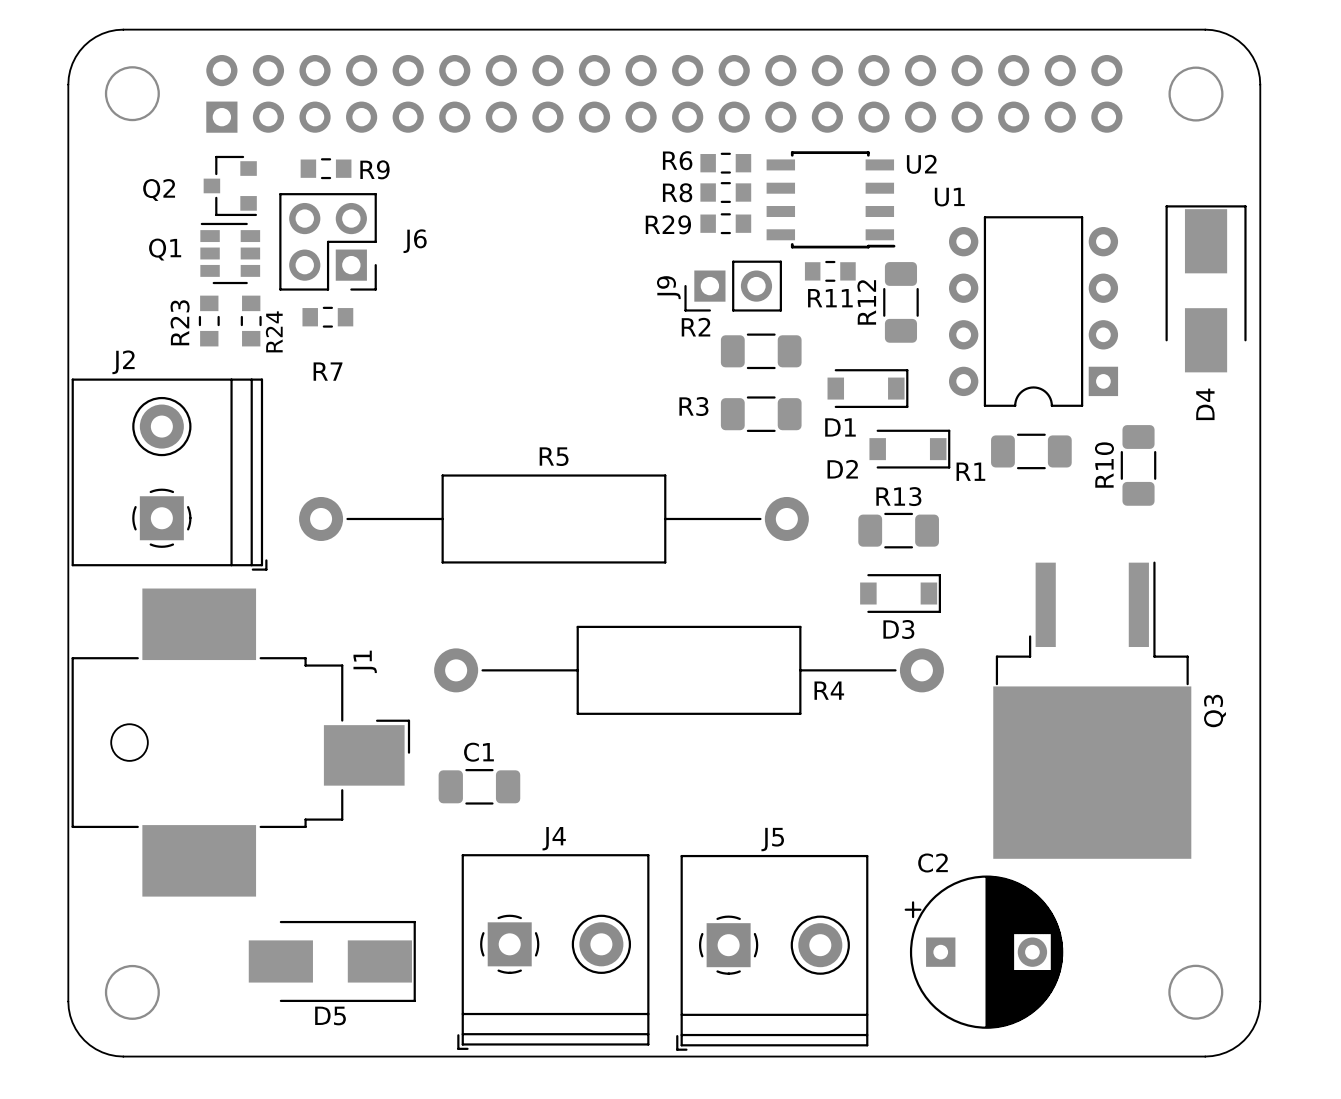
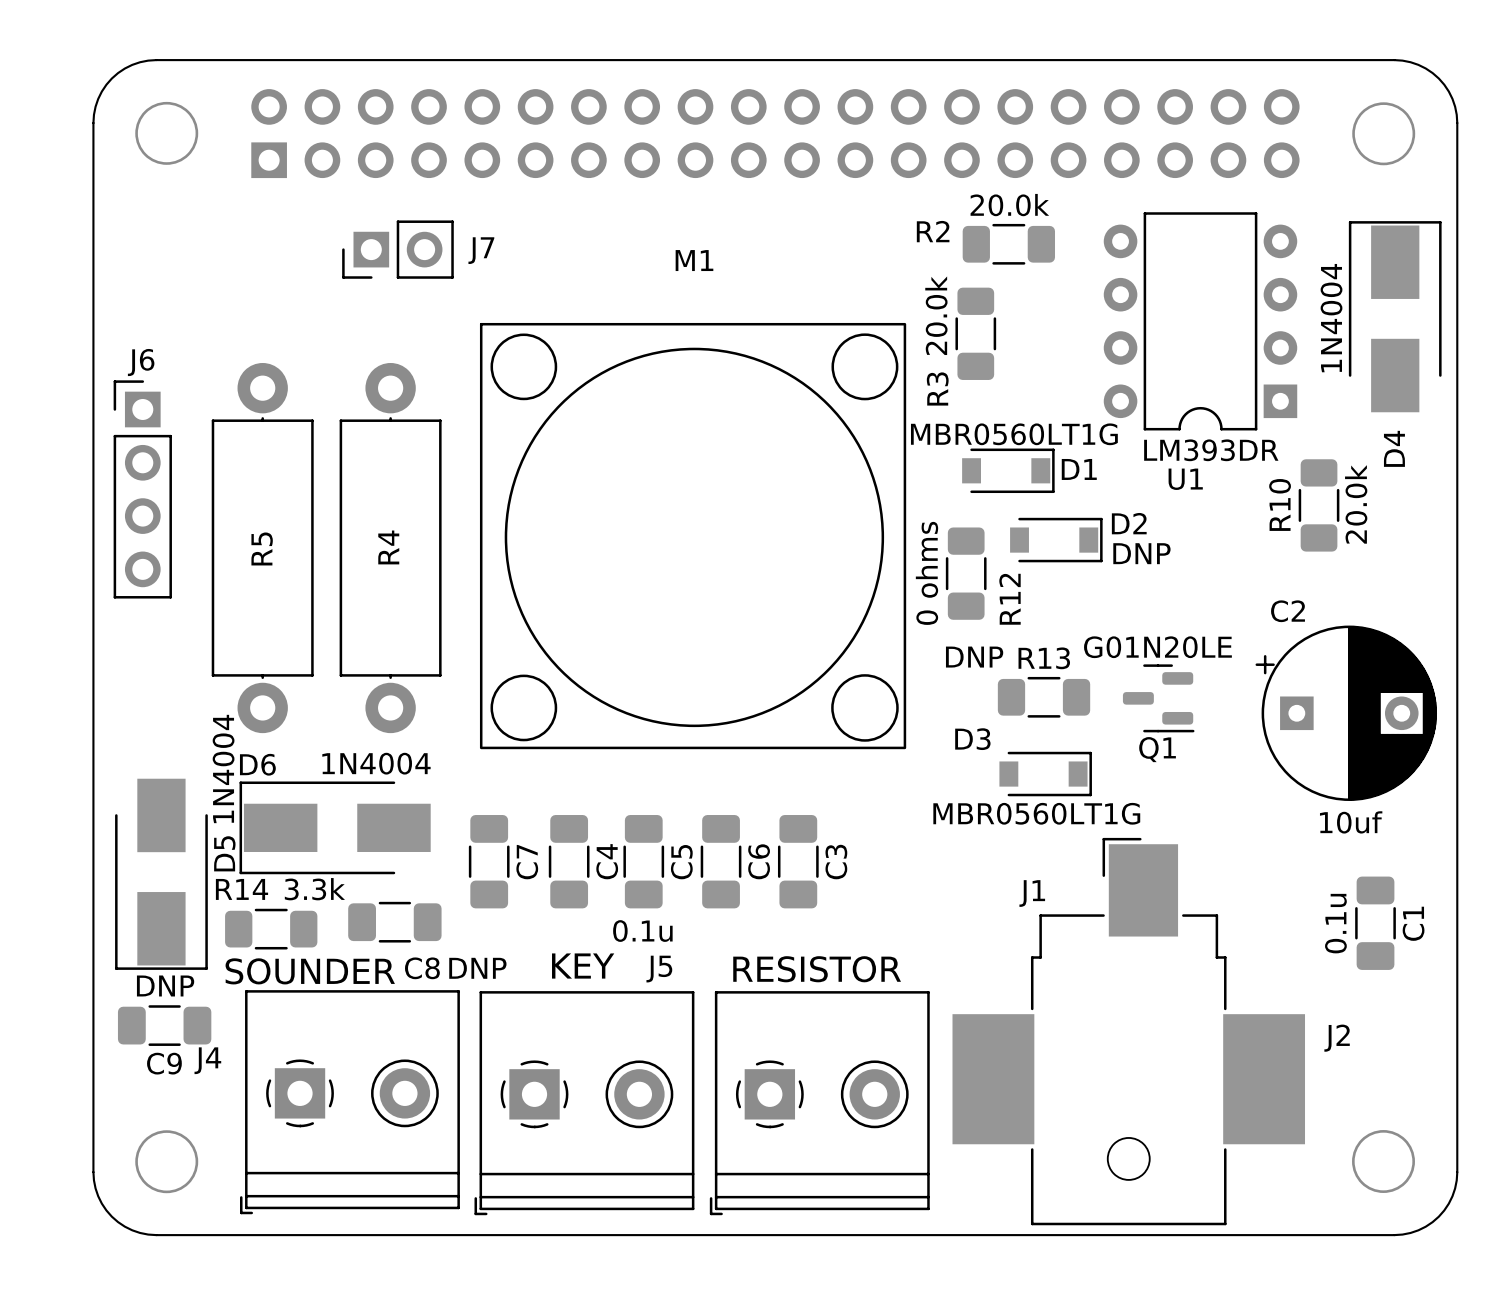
Q1 footprint: [203, 155, 258, 217] -> [1122, 664, 1195, 733]
R2 value: none -> 20.0k (1009, 205)
R6: (725, 163) -> none
R9: (326, 168) -> none
R8: (725, 192) -> none
J6 footprint: [279, 193, 377, 291] -> [113, 380, 172, 599]
J7: none -> (397, 249)
U1 name position: U1 (949, 197) -> U1 (1185, 479)
U2: (831, 199) -> none
R29: (725, 223) -> none
J6 name position: J6 (415, 241) -> J6 (141, 362)
Q1 name position: Q1 (165, 249) -> Q1 (1157, 749)
Q2: (230, 253) -> none
R3 value: none -> 20.0k (936, 315)
D4 value: none -> 1N4004 (1331, 318)
R11: (830, 271) -> none
J9: (733, 286) -> none
D4 position: (1206, 288) -> (1395, 316)
R12 name position: R12 (866, 302) -> R12 (1010, 599)
R12 position: (900, 302) -> (966, 573)
U1 position: (1033, 311) -> (1200, 321)
R7: (327, 317) -> none
R23: (209, 321) -> none
R24: (251, 321) -> none
R2 name position: R2 (695, 327) -> R2 (933, 231)
R2 position: (761, 351) -> (1008, 244)
D1 value: none -> MBR0560LT1G (1014, 434)
J2 name position: J2 (123, 362) -> J2 (1337, 1038)
U1 value: none -> LM393DR (1211, 450)
R3 name position: R3 (693, 406) -> R3 (937, 388)
R3 rotation: 0° (761, 414) -> 90° clockwise (975, 333)
R3 position: (761, 414) -> (975, 333)
R10 value: none -> 20.0k (1356, 504)
D1 name position: D1 (840, 427) -> D1 (1079, 469)
M1: none -> (693, 536)
R1: (1031, 451) -> none
R5 name position: R5 (554, 456) -> R5 (262, 548)
D2 value: none -> DNP (1141, 553)
R10 position: (1138, 465) -> (1319, 505)
D2 name position: D2 (842, 469) -> D2 (1129, 523)
J2 rotation: 0° (169, 474) -> 90° clockwise (819, 1103)
J2 position: (169, 474) -> (819, 1103)
R5 footprint: [299, 474, 809, 564] -> [211, 362, 314, 734]
R12 value: none -> 0 ohms (926, 573)
R13 position: (898, 530) -> (1044, 697)
Q1 value: none -> G01N20LE (1157, 647)
R13 value: none -> DNP (974, 657)
D3 position: (900, 593) -> (1045, 774)
R4 footprint: [434, 625, 944, 715] -> [339, 362, 442, 734]
D3 name position: D3 (898, 629) -> D3 (972, 739)
D5 value: none -> 1N4004 (223, 768)
D3 value: none -> MBR0560LT1G (1036, 813)
R4 name position: R4 (829, 690) -> R4 (388, 547)
C2 value: none -> 10uf (1351, 822)
D6: none -> 1N4004 (335, 827)
Q3: (1092, 710) -> none
C7: none -> (489, 861)
C4: none -> (569, 861)
C5: none -> (643, 861)
C6: none -> (721, 861)
C3: none -> 0.1u (798, 861)
J1 rotation: 0° (240, 742) -> 90° counterclockwise (1128, 1031)
J1 position: (240, 742) -> (1128, 1031)
C8: none -> DNP (394, 922)
C1 value: none -> 0.1u (1335, 923)
C1 rotation: 0° (479, 786) -> 90° clockwise (1375, 923)
C1 position: (479, 786) -> (1375, 923)
R14: none -> 3.3k (271, 929)
text: none -> KEY (583, 966)
text: none -> RESISTOR (817, 969)
text: none -> SOUNDER (310, 971)
J4 name position: J4 (554, 838) -> J4 (207, 1060)
J5 name position: J5 (772, 839) -> J5 (659, 969)
C9: none -> DNP (164, 1025)
J4 position: (553, 952) -> (349, 1102)
J5 position: (772, 952) -> (584, 1103)
C2 position: (983, 952) -> (1346, 713)
D5 rotation: 0° (332, 961) -> 90° clockwise (161, 874)
D5 position: (332, 961) -> (161, 874)
D5 name position: D5 (330, 1015) -> D5 (224, 853)

